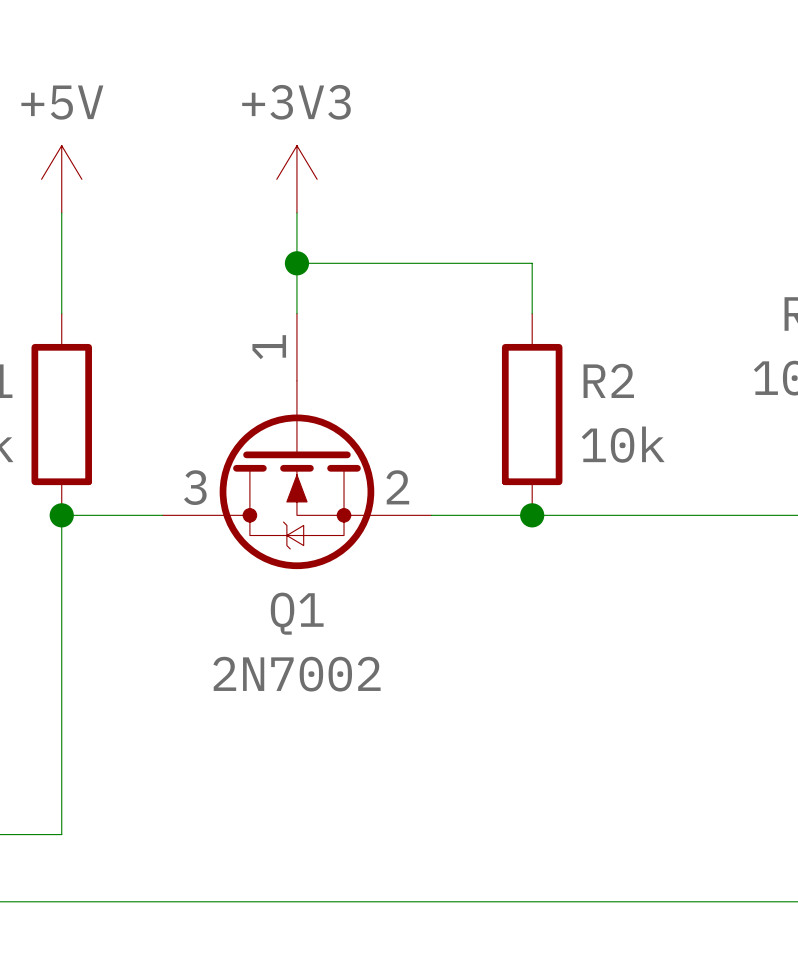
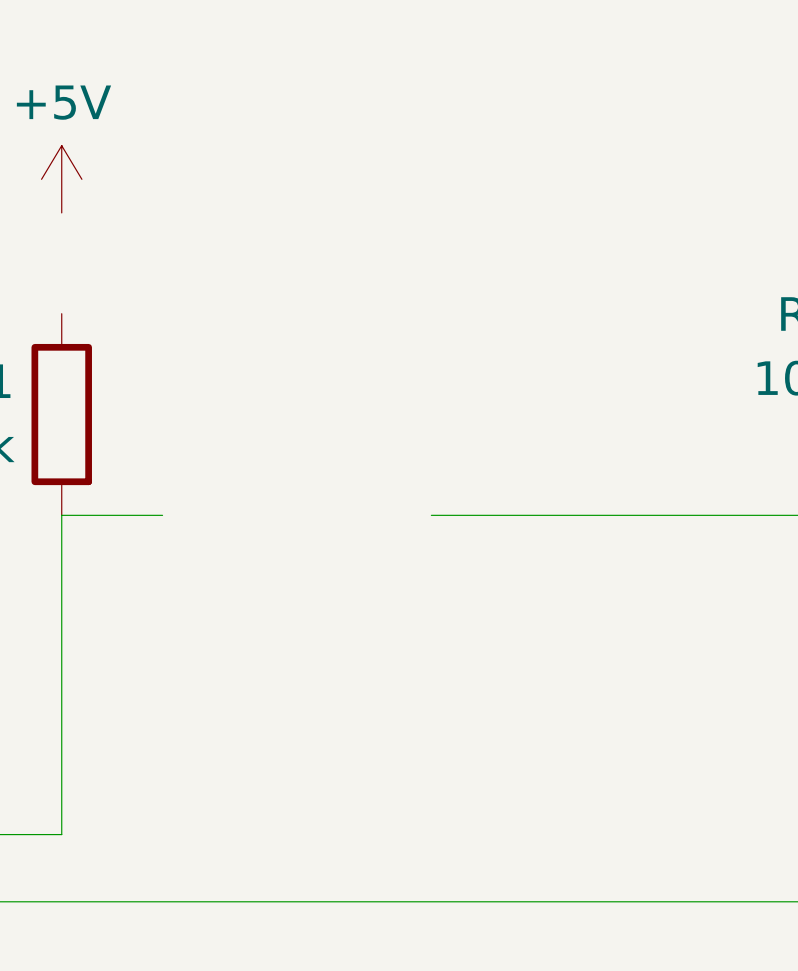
power symbol: +3V3 (296, 179) -> none
wire: (61, 212) (61, 313) -> none
wire: (296, 212) (296, 313) -> none
wire: (296, 263) (532, 263) (532, 313) -> none
junction: (296, 263) -> none
R2: 10k (532, 414) -> none
Q1: 2N7002 (296, 441) -> none
junction: (61, 515) -> none
junction: (532, 515) -> none

